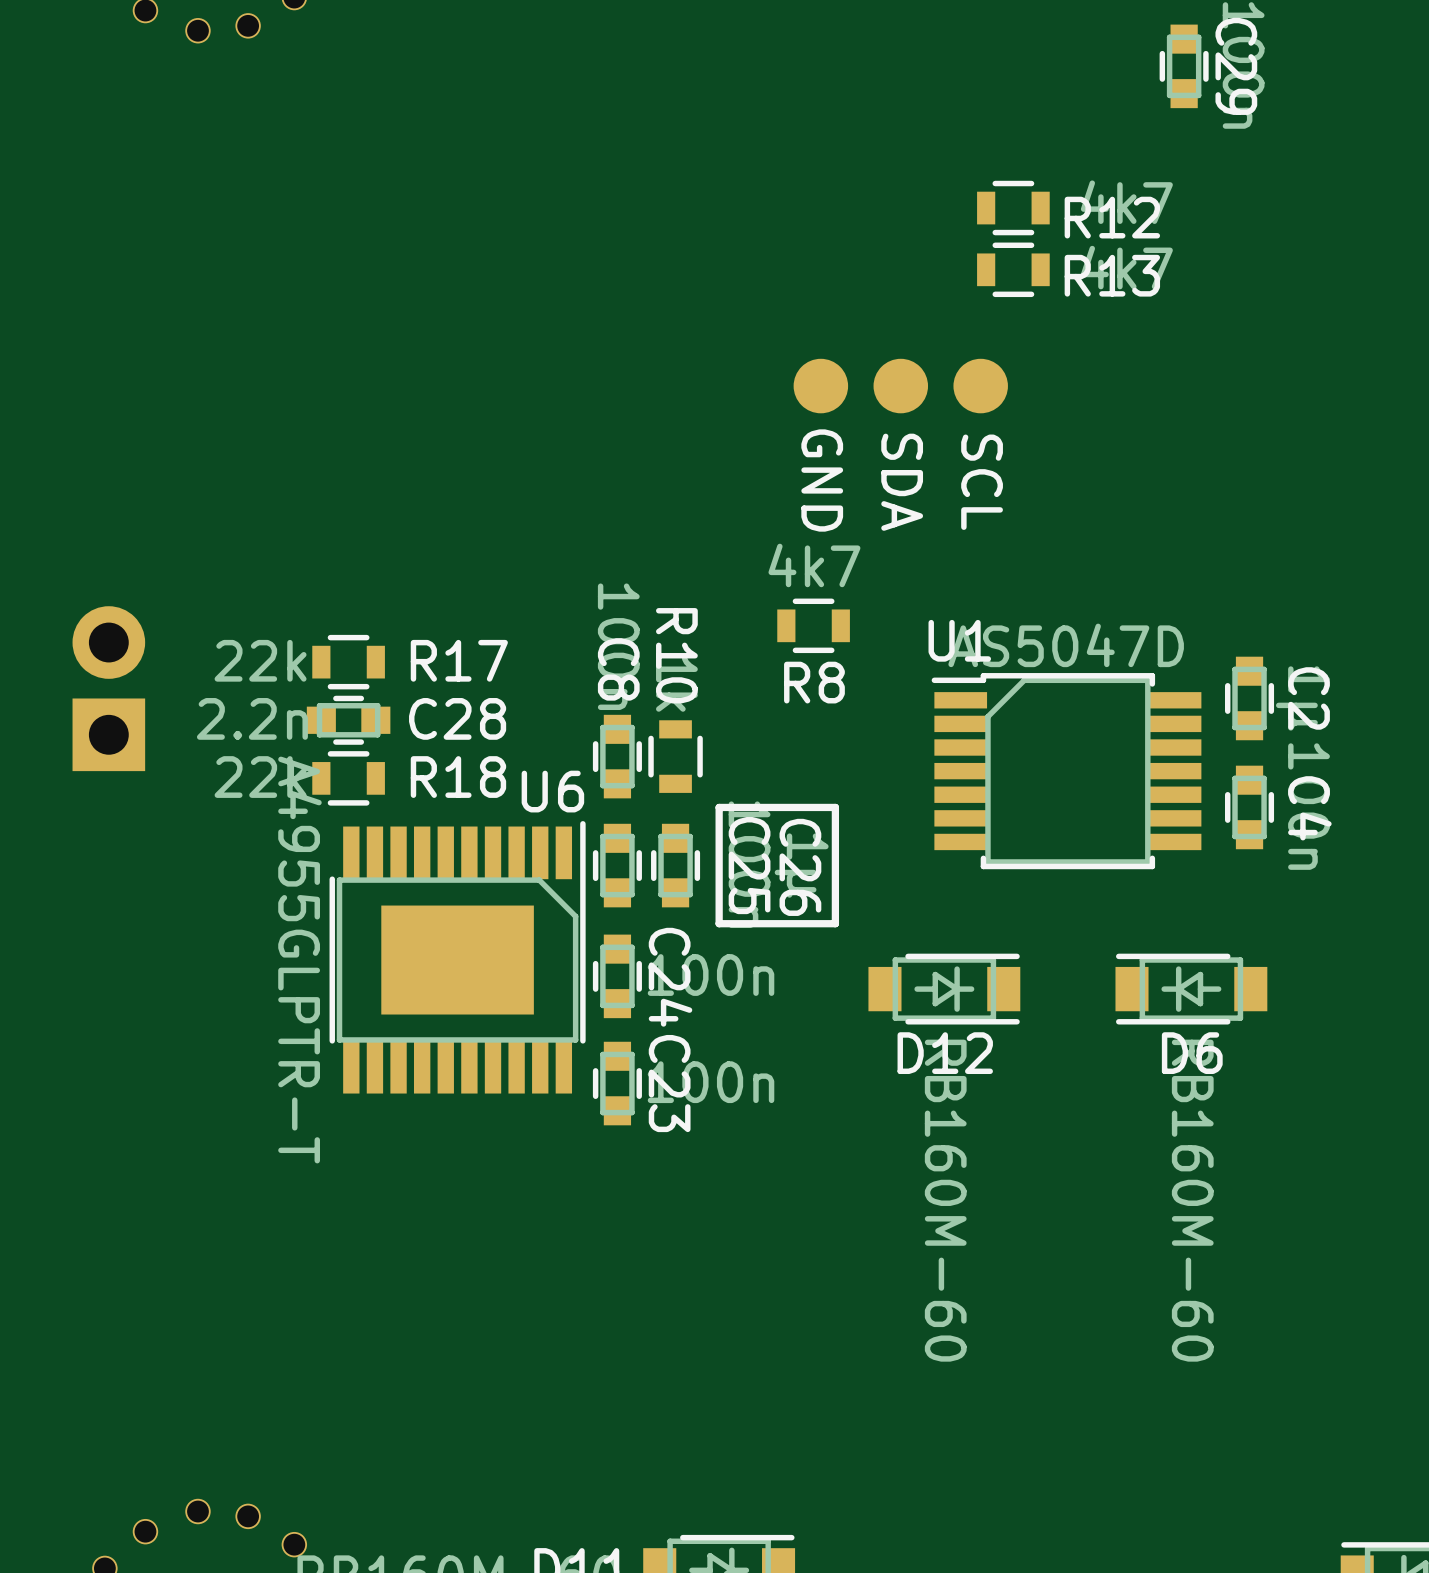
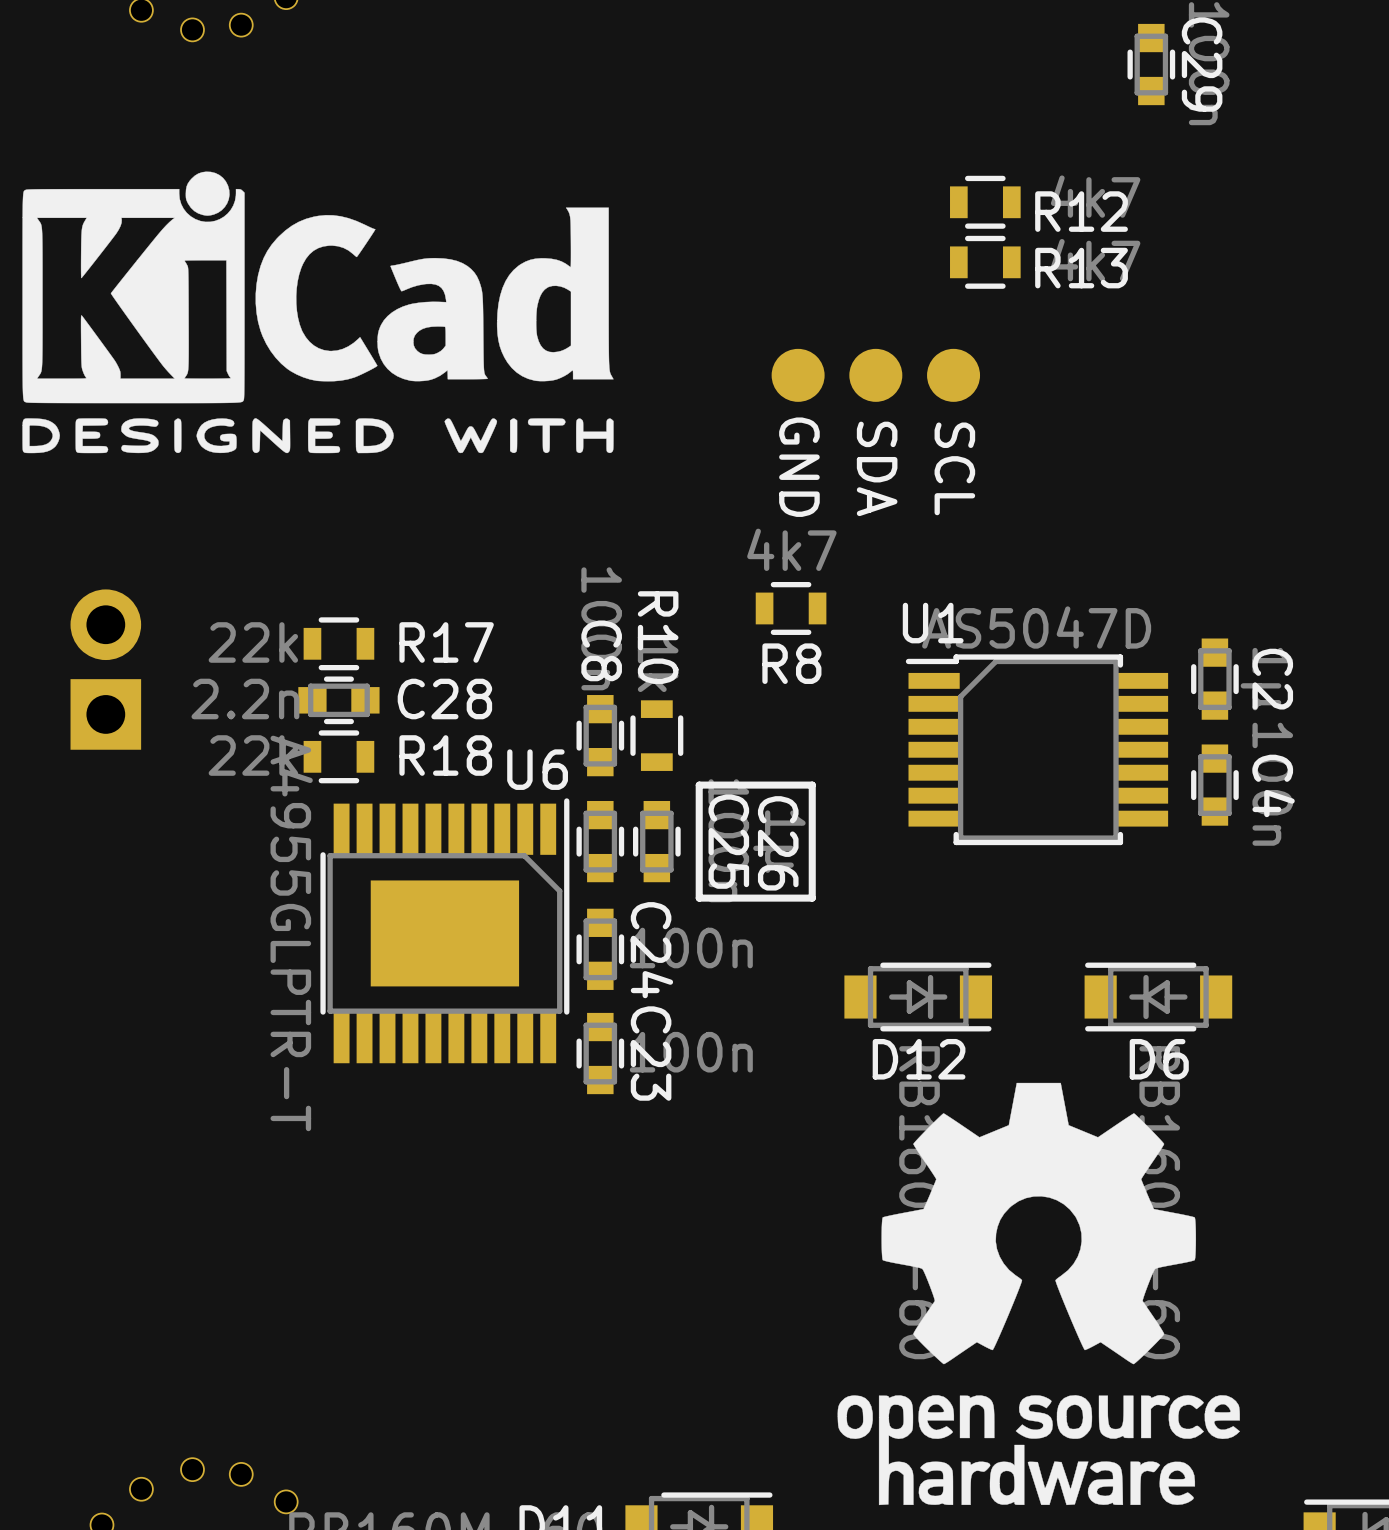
drawing: none -> [22, 171, 614, 454]
D12 position: (944, 989) -> (918, 997)
D6 position: (1191, 989) -> (1158, 997)
drawing: none -> [837, 1082, 1240, 1506]

